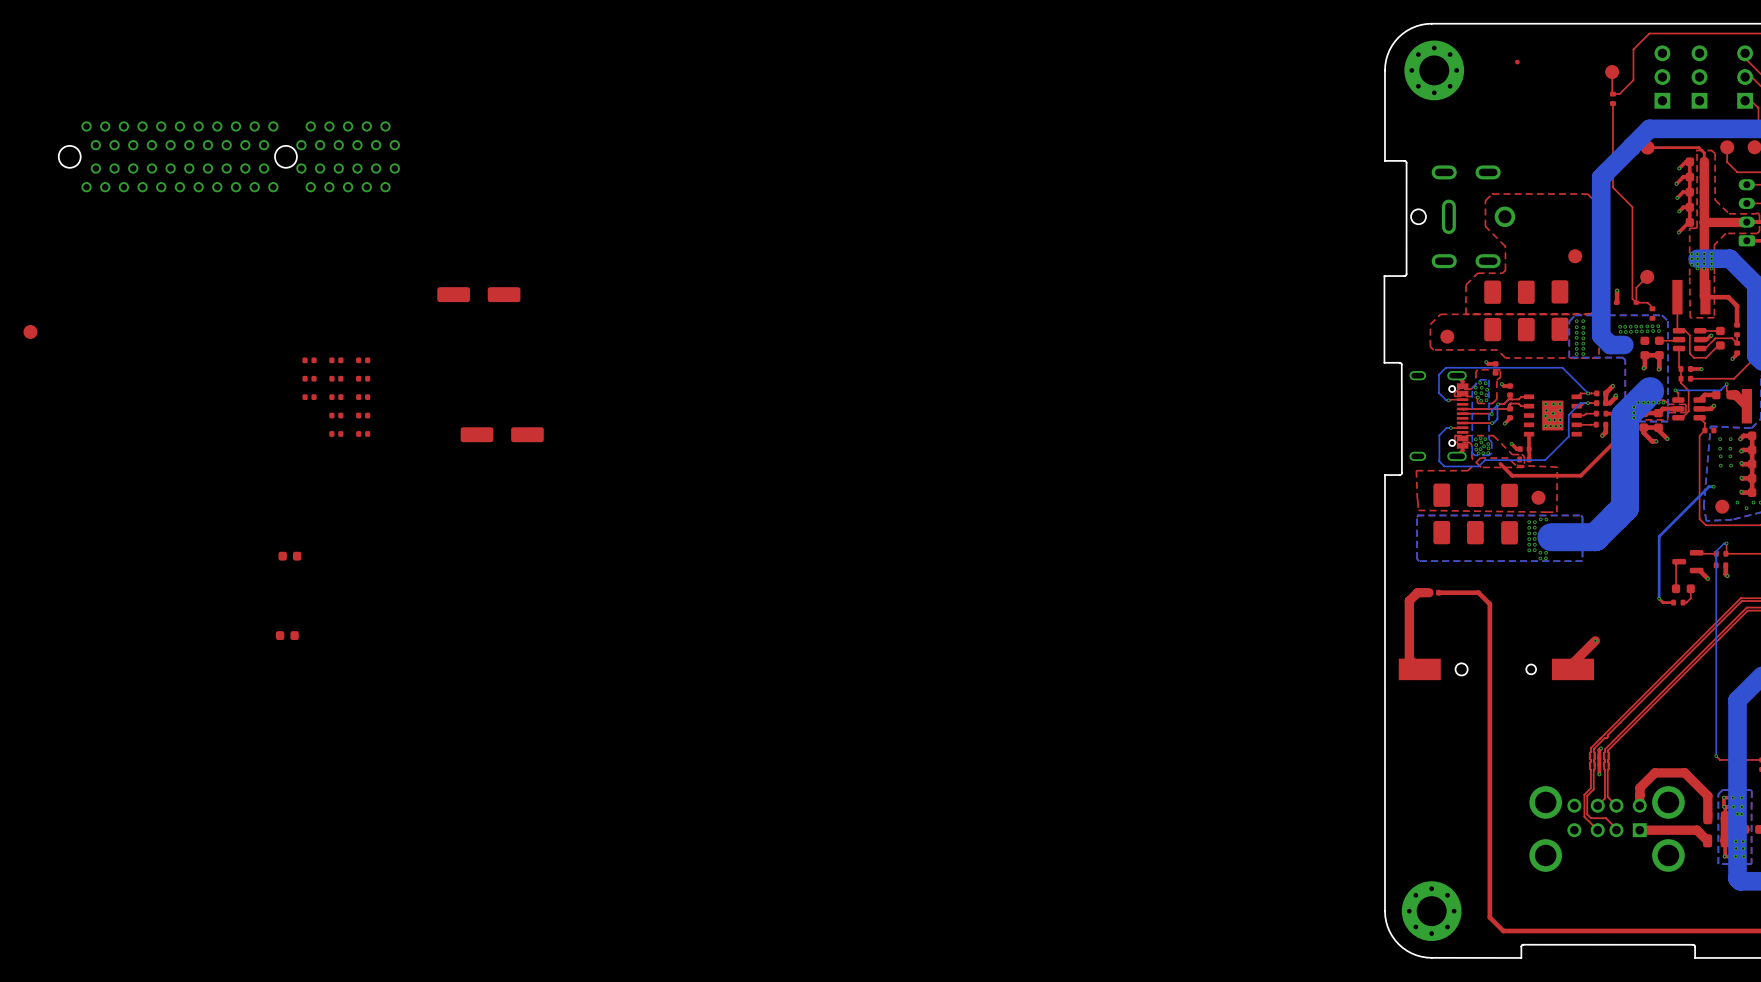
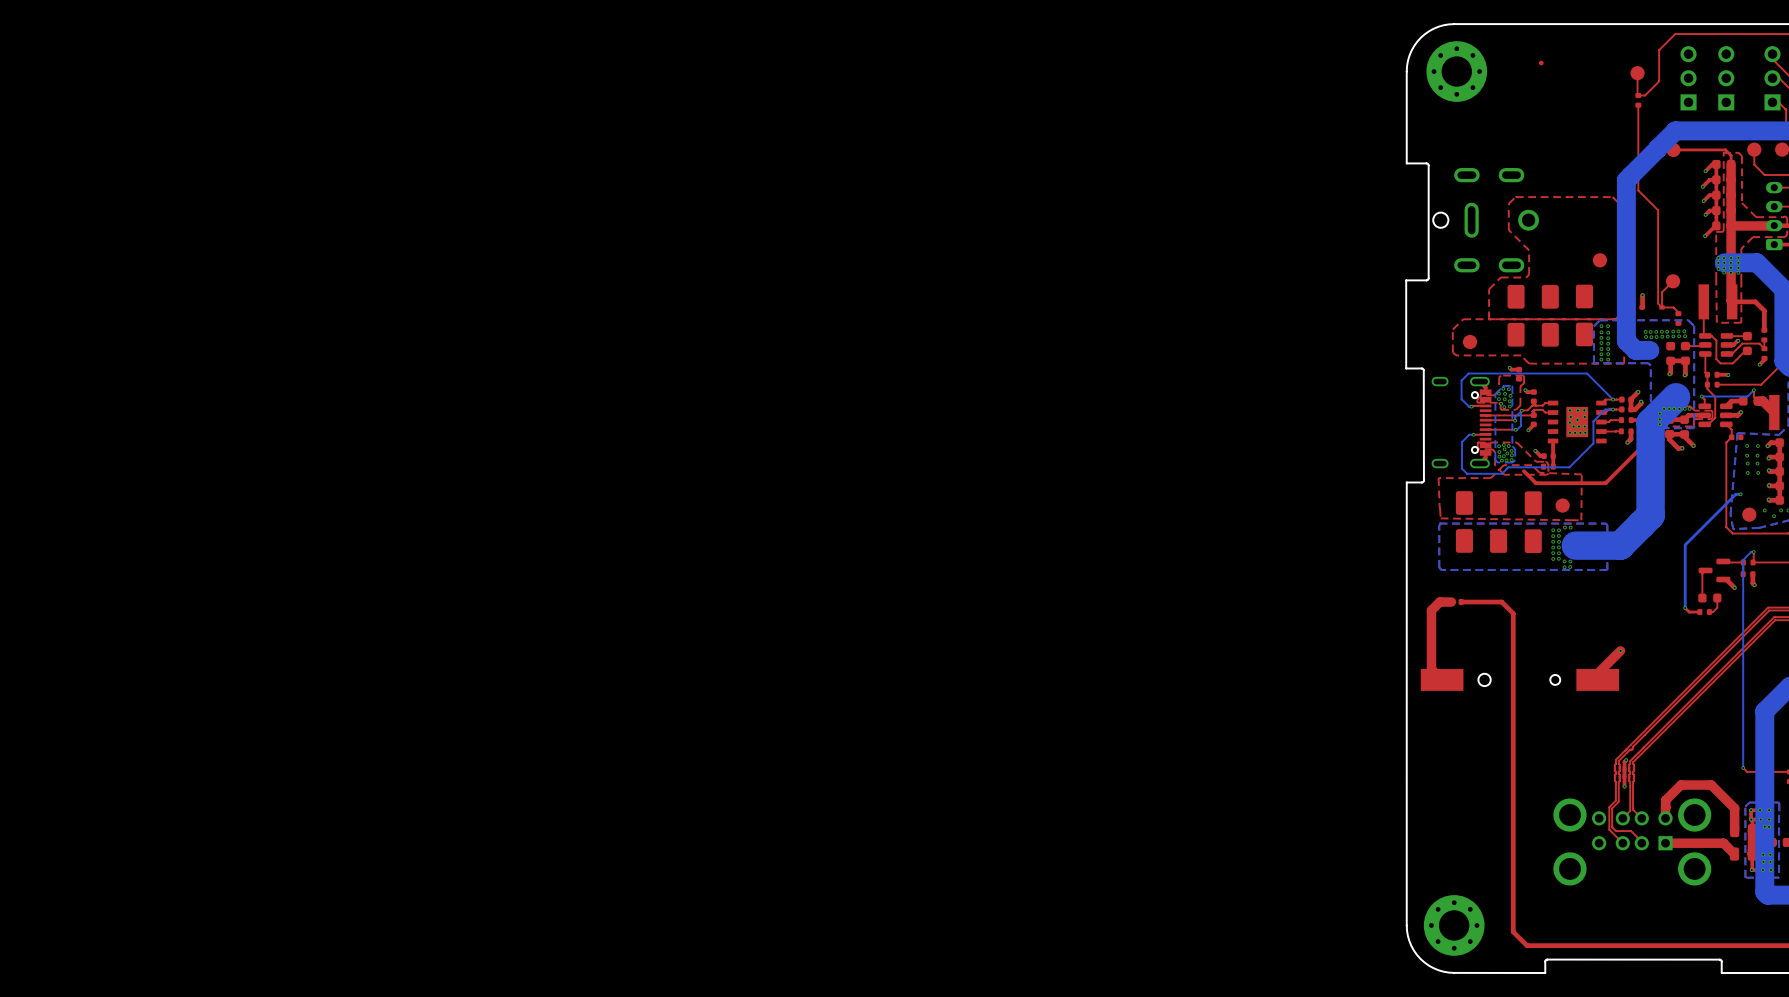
part: (229, 156) -> none
part: (478, 294) -> none
part: (30, 331) -> none
part: (309, 360) -> none
part: (336, 360) -> none
part: (363, 360) -> none
part: (309, 378) -> none
part: (336, 378) -> none
part: (363, 378) -> none
part: (309, 397) -> none
part: (336, 397) -> none
part: (363, 397) -> none
part: (336, 415) -> none
part: (363, 415) -> none
part: (336, 433) -> none
part: (363, 433) -> none
part: (502, 434) -> none
part: (289, 556) -> none
part: (287, 635) -> none

